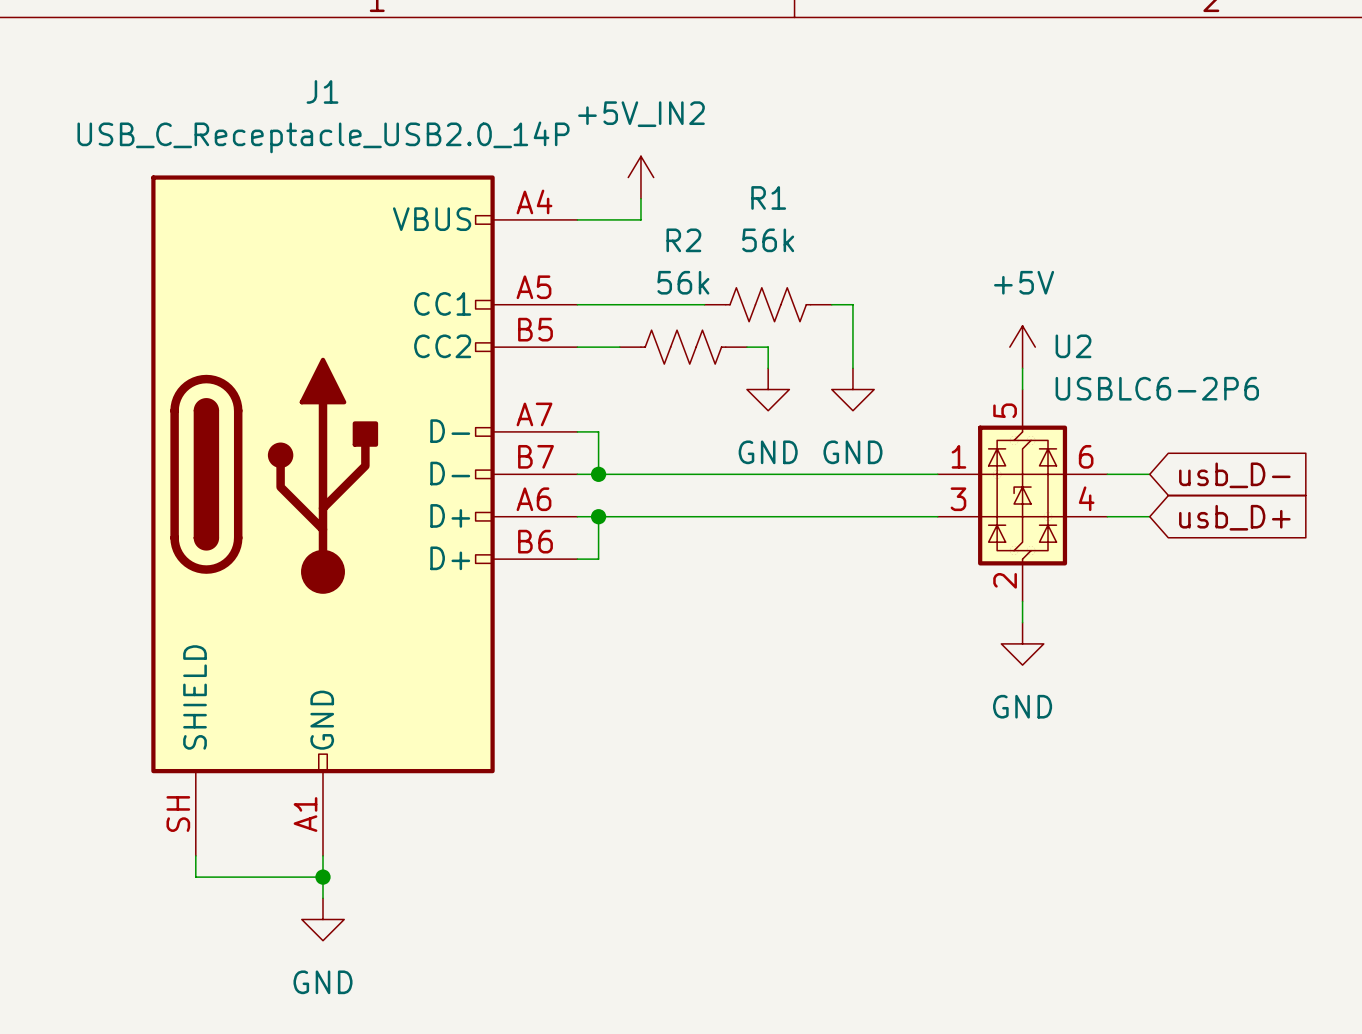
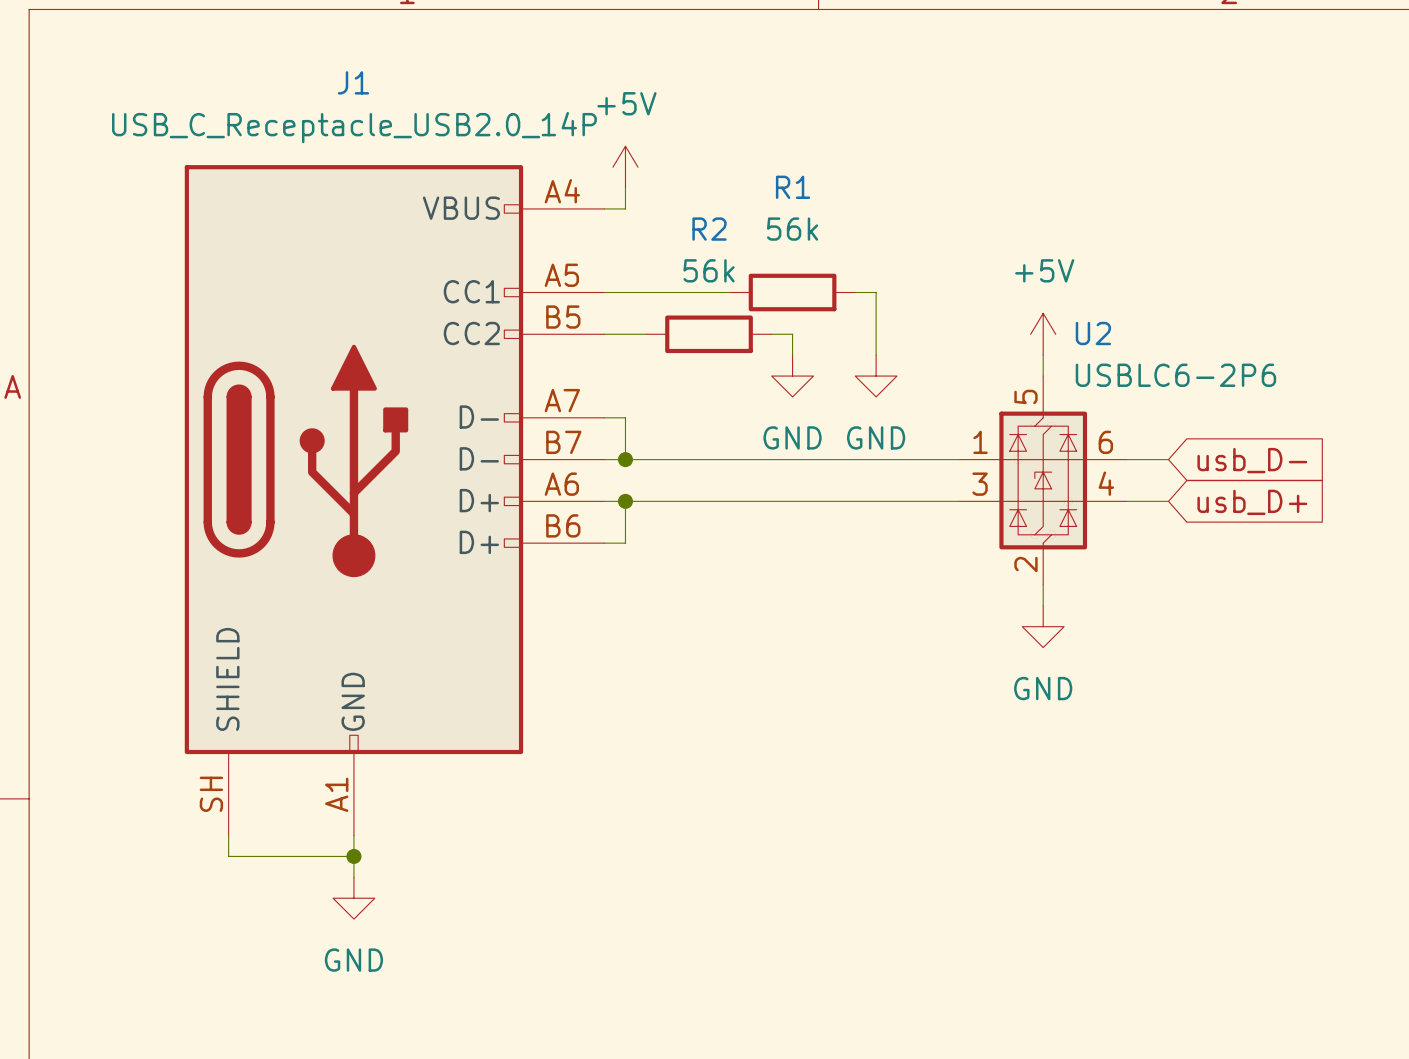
power symbol: none -> +5V (625, 167)
power symbol: +5V_IN2 (640, 177) -> none
wire: (640, 198) (640, 219) (598, 219) -> (625, 188) (625, 208)
R1 symbol: [704, 287, 832, 322] -> [729, 273, 856, 312]
R2 symbol: [619, 330, 747, 365] -> [646, 315, 772, 354]

